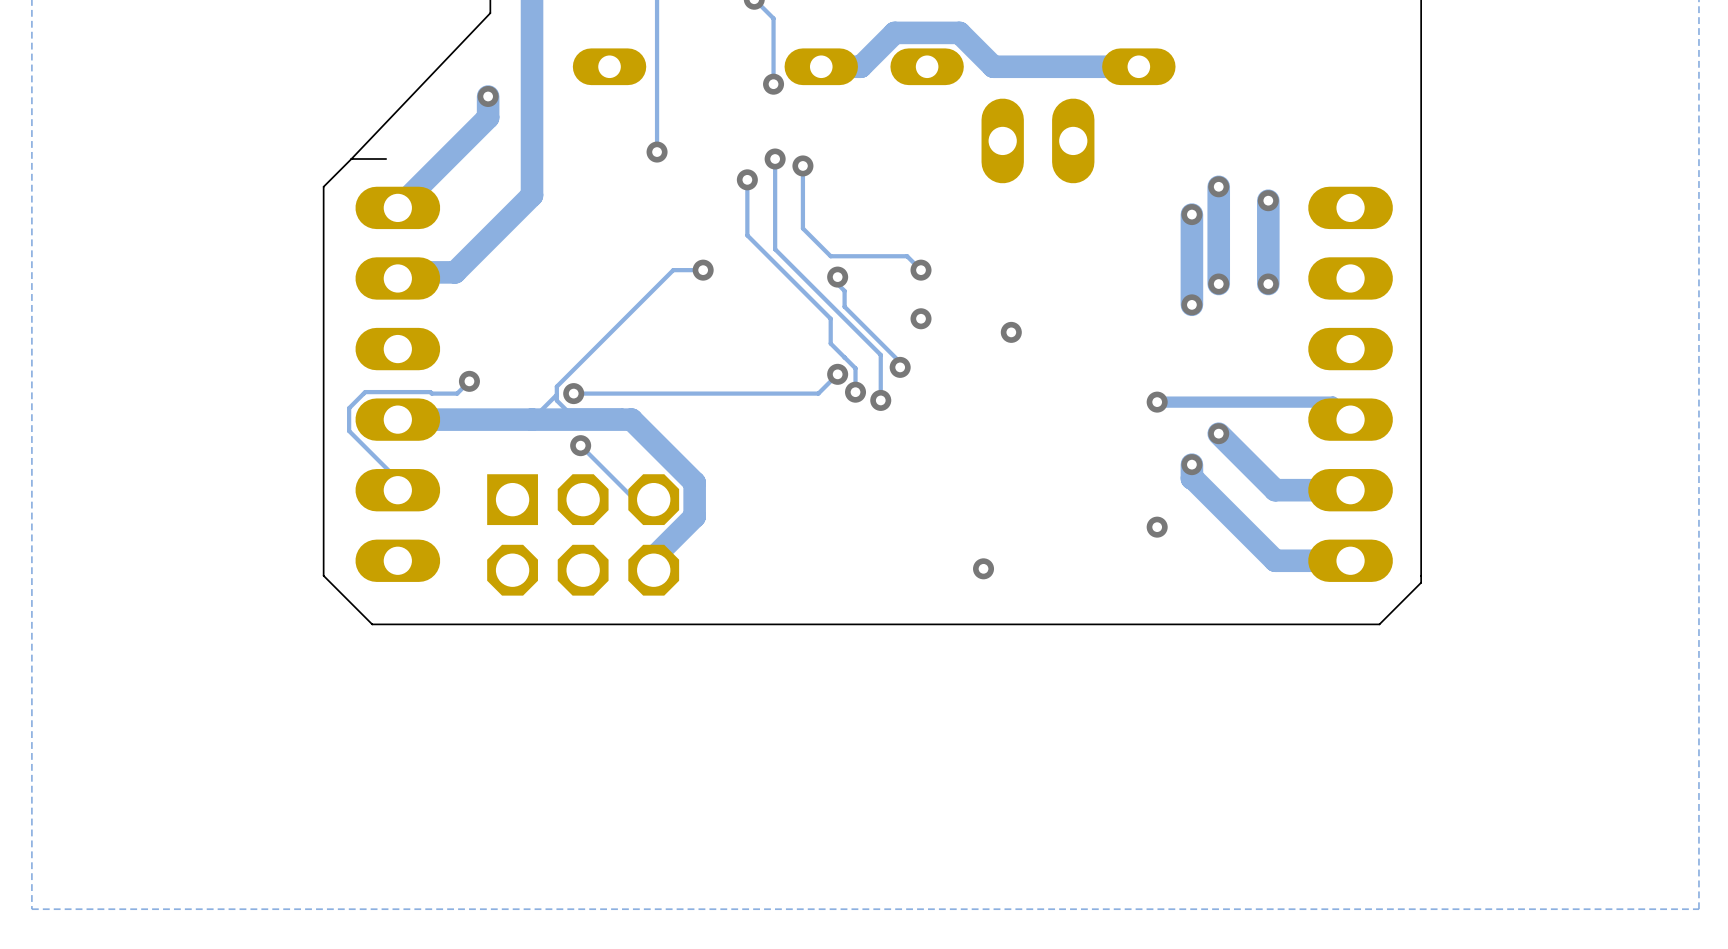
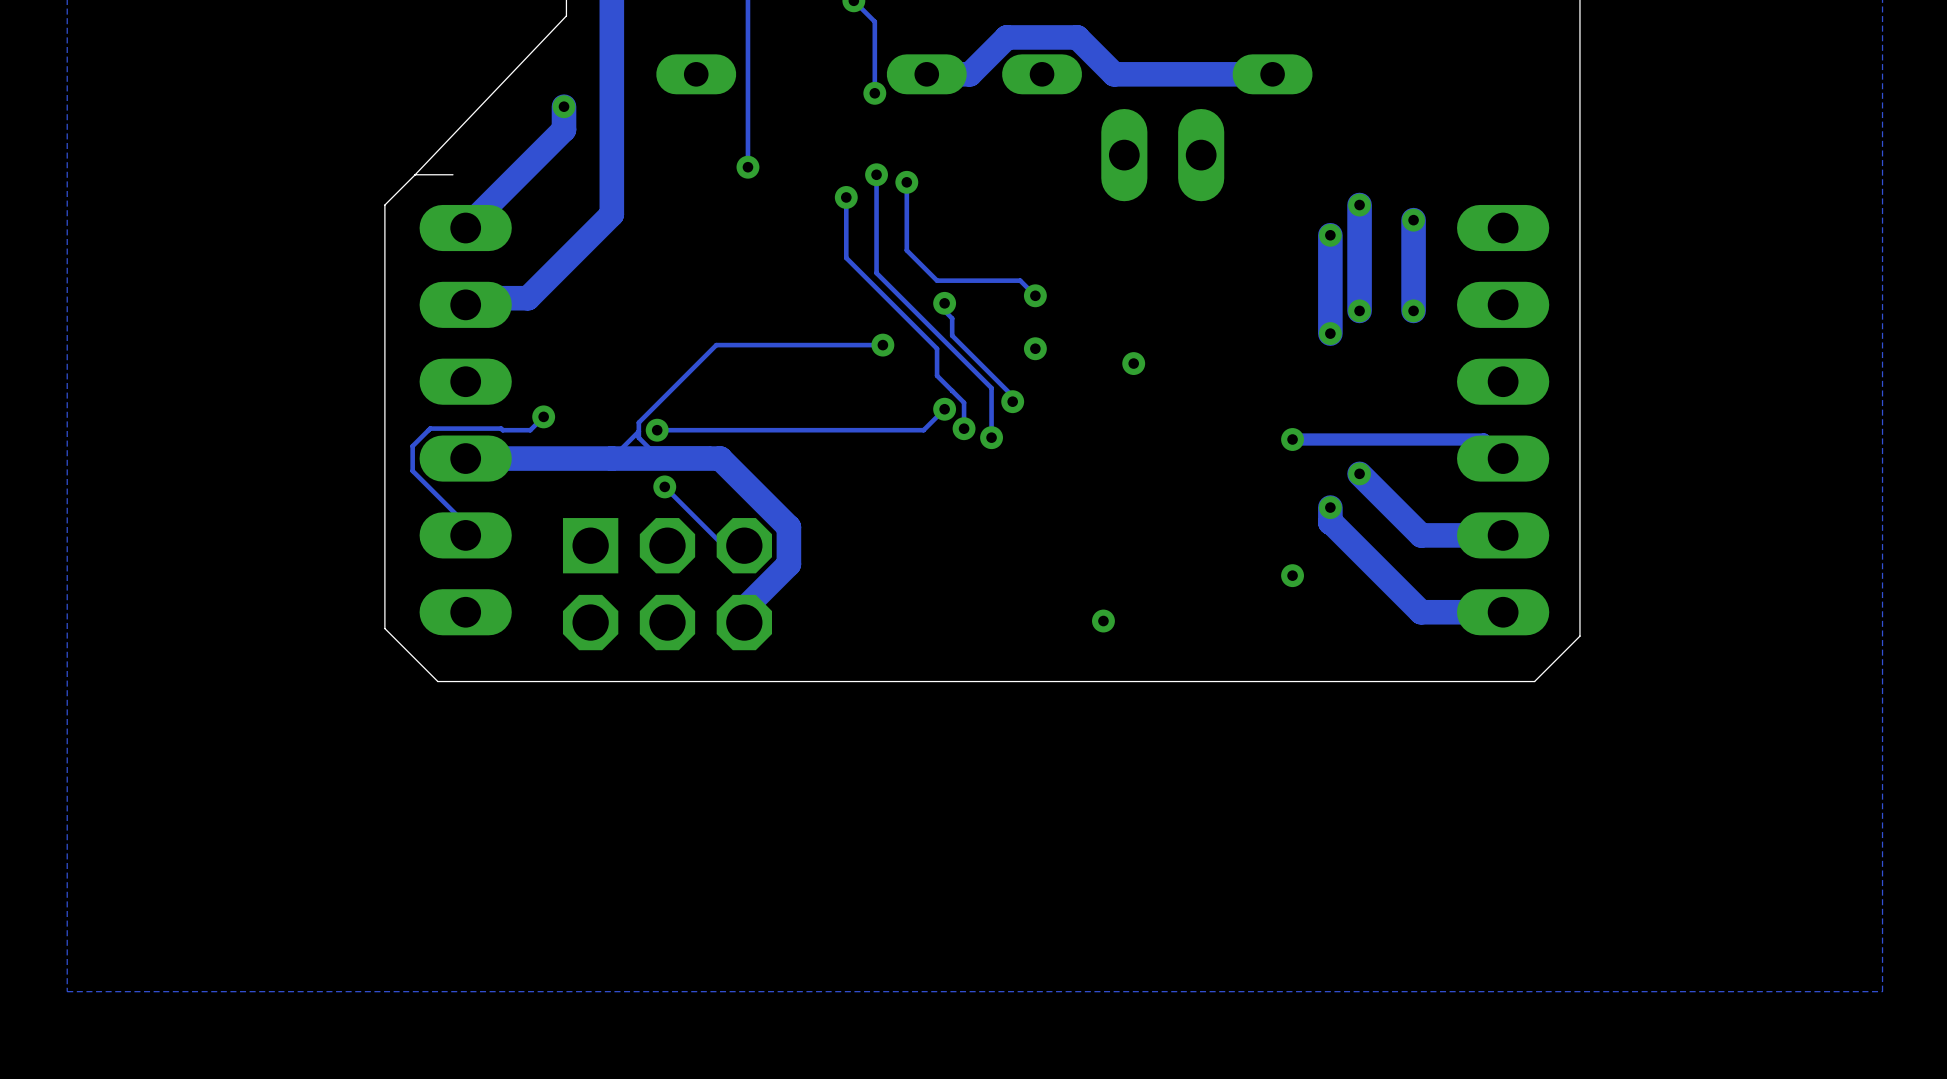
track: (703, 270) (673, 270) (628, 315) -> (882, 345) (716, 345)
via position: (703, 270) -> (882, 345)

